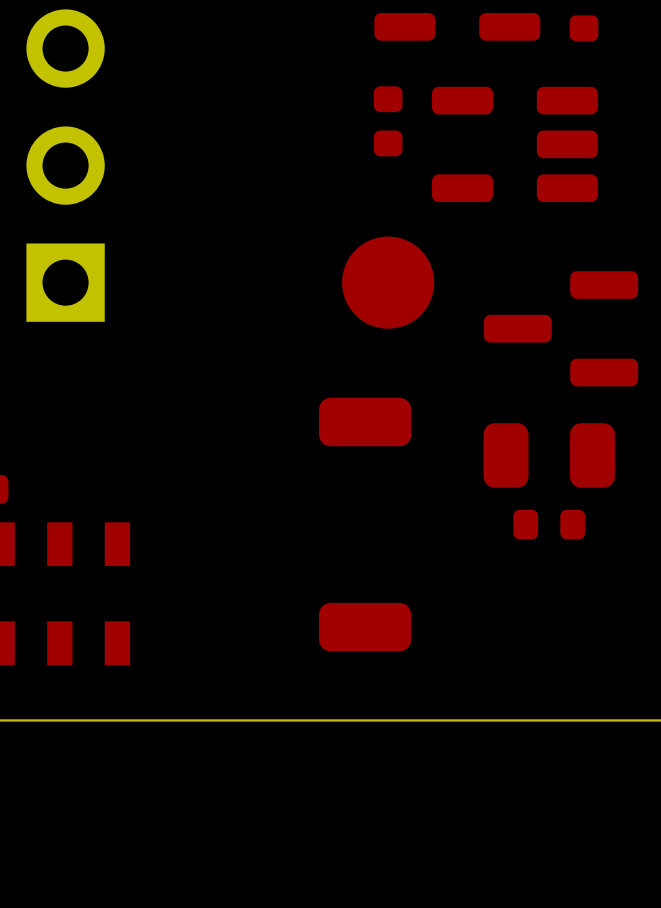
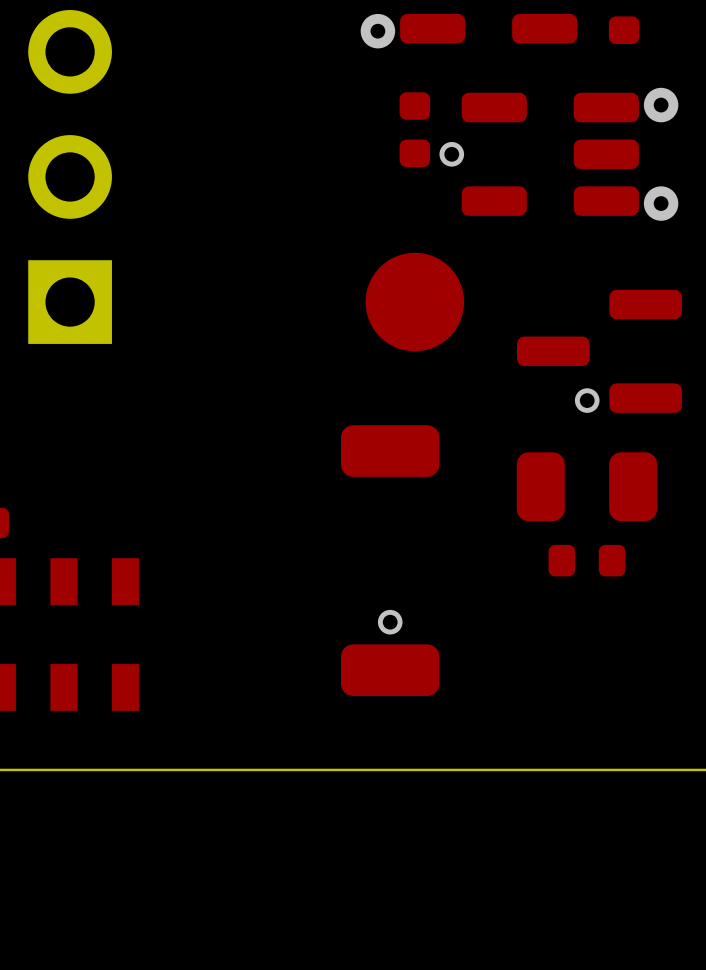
via: none -> (377, 31)
via: none -> (661, 105)
via: none -> (451, 154)
via: none -> (661, 203)
via: none -> (587, 400)
via: none -> (390, 622)

